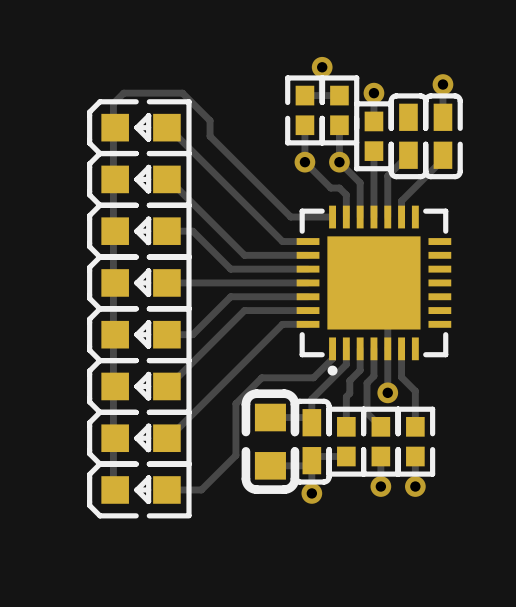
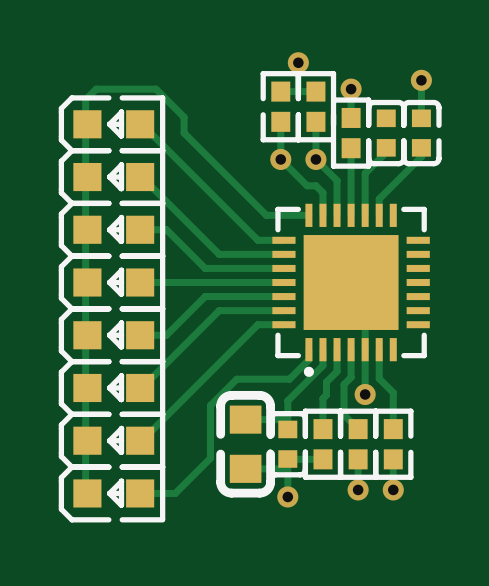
part footprint: [388, 93, 429, 180] -> [366, 99, 407, 167]
part footprint: [423, 93, 463, 180] -> [401, 99, 442, 167]
part footprint: [292, 398, 332, 485] -> [267, 411, 309, 478]

